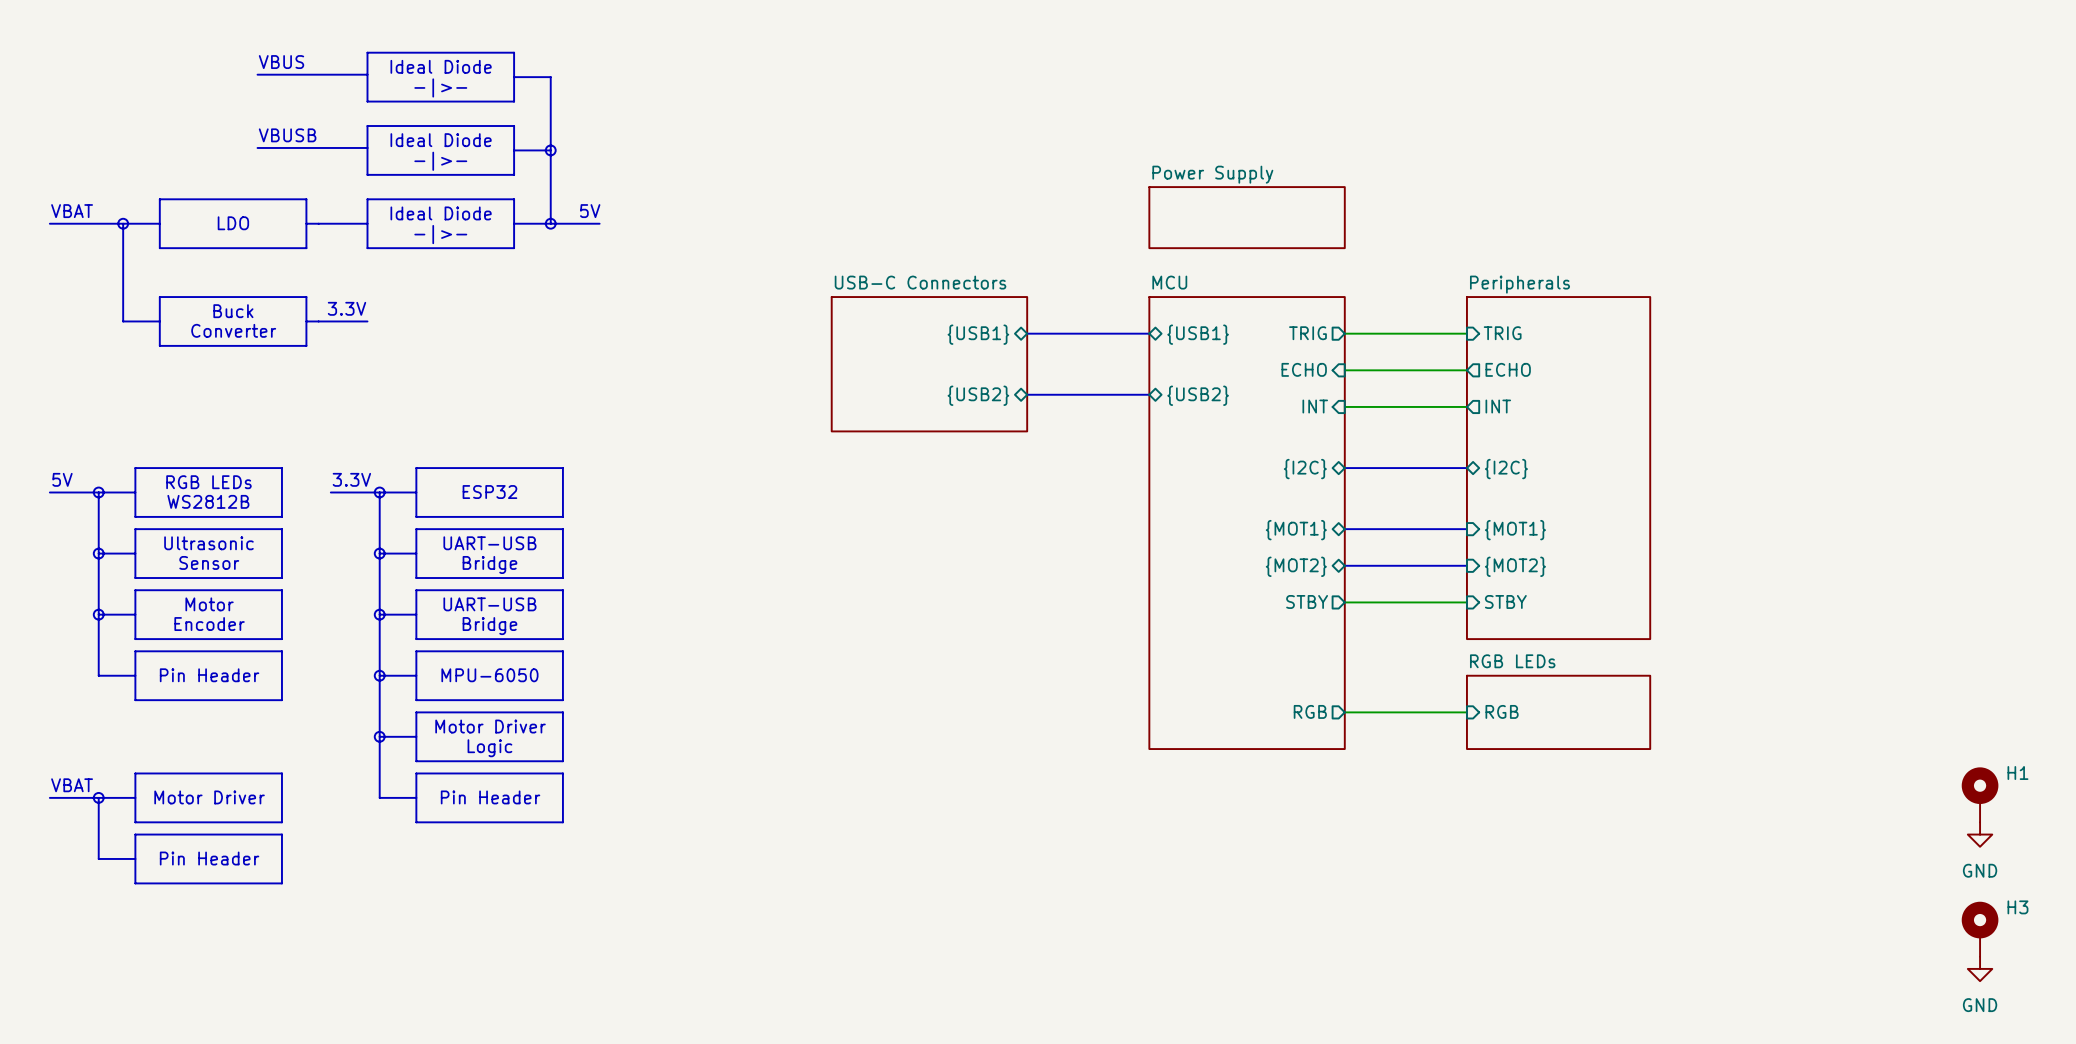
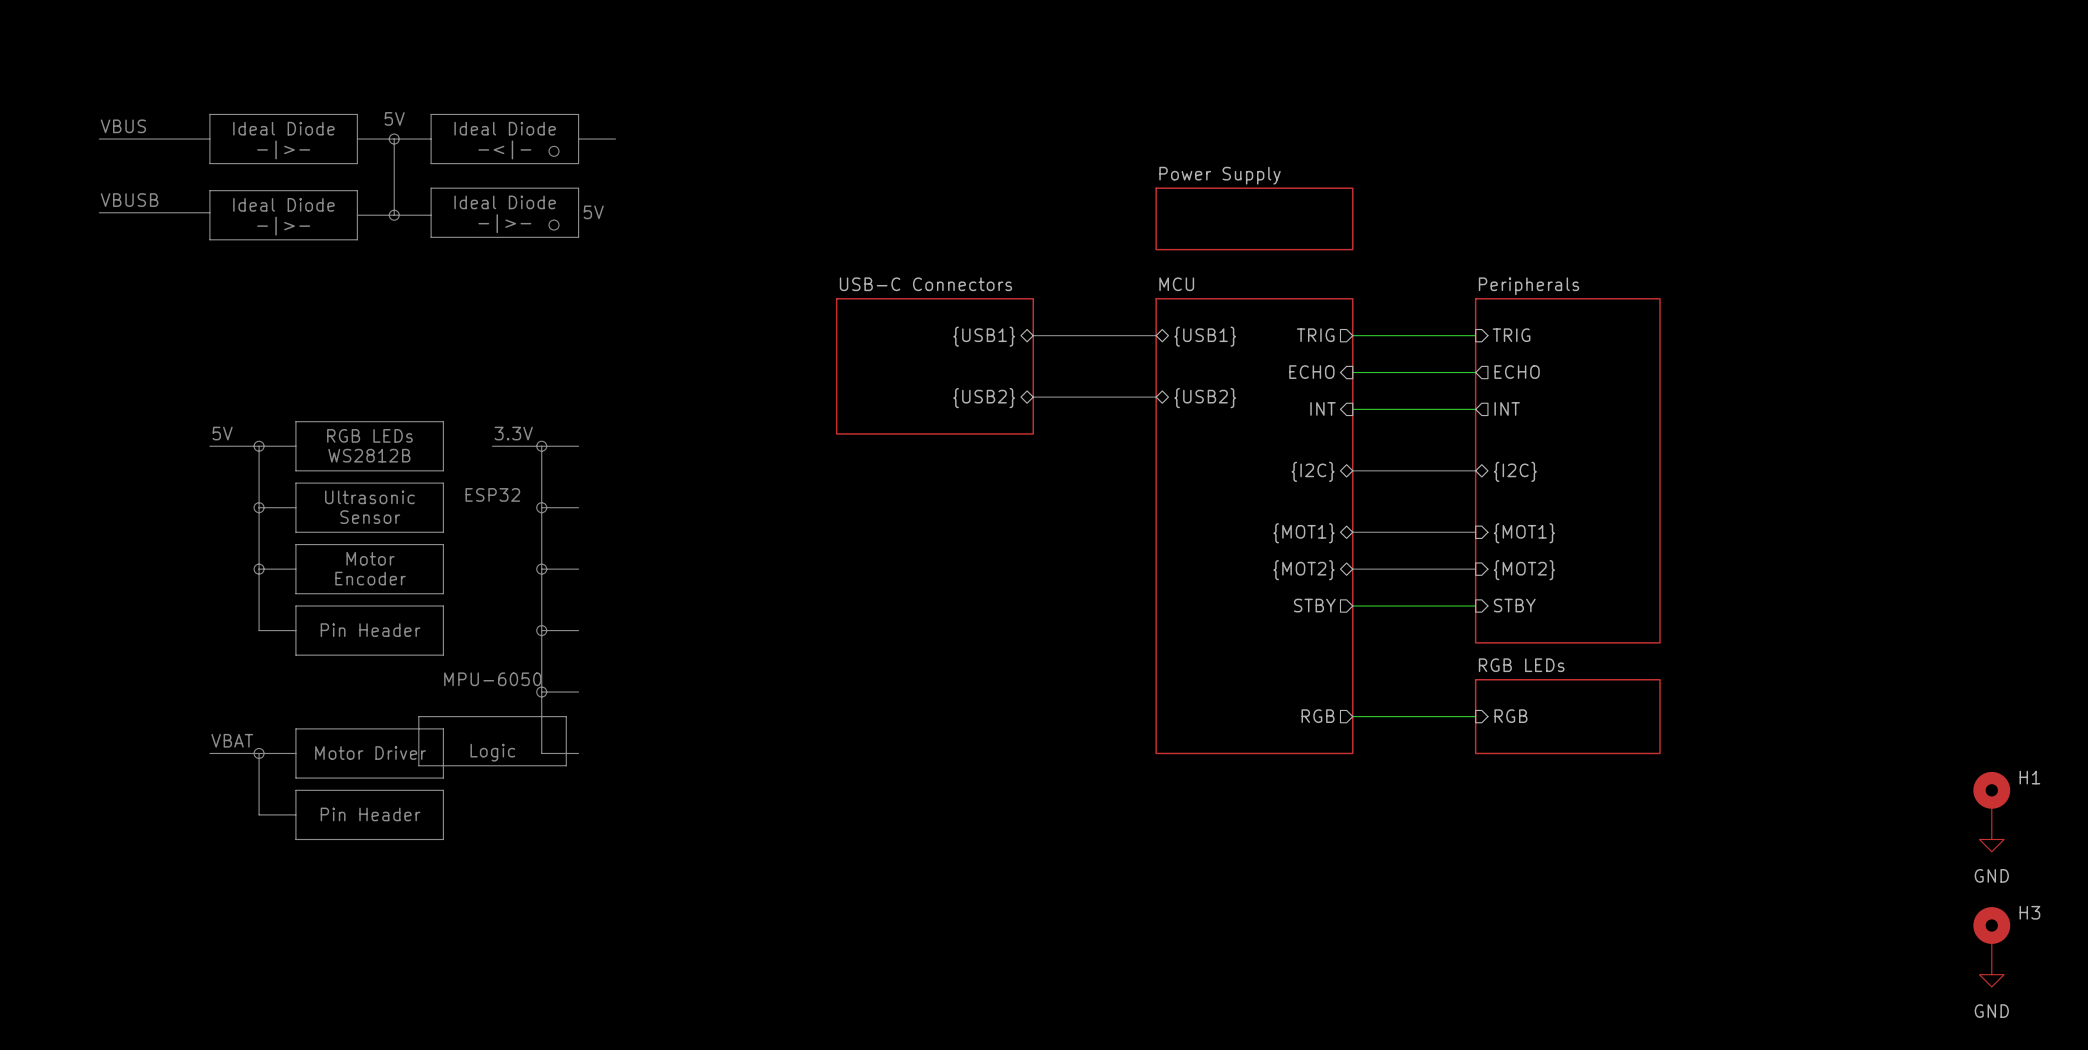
line: (367, 52) (367, 101) (514, 101) (514, 52) (367, 52) -> (209, 190) (209, 239) (357, 239) (357, 190) (209, 190)
text position: VBUS (281, 62) -> VBUS (123, 126)
text: Ideal Diode (441, 66) -> none
line: (257, 74) (367, 74) -> (99, 139) (209, 139)
line: (514, 77) (550, 77) (550, 223) -> none
text: -|>- (440, 87) -> none
text: none -> 5V (394, 118)
line: (367, 126) (514, 126) (514, 174) (367, 174) (367, 126) -> (431, 114) (578, 114) (578, 163) (431, 163) (431, 114)
text: none -> Ideal Diode (283, 128)
drawing: none -> [389, 134, 400, 145]
text position: VBUSB (287, 135) -> VBUSB (129, 200)
line: none -> (357, 139) (431, 139)
line: none -> (394, 139) (394, 215)
text position: Ideal Diode (441, 140) -> Ideal Diode (505, 128)
line: (257, 147) (367, 147) -> (99, 212) (209, 212)
text: none -> -|>- (283, 149)
line: (514, 150) (550, 150) -> (578, 139) (615, 139)
text: -|>- (440, 161) -> -<|- (504, 149)
line: (159, 199) (159, 248) (306, 248) (306, 199) (159, 199) -> (209, 114) (209, 163) (357, 163) (357, 114) (209, 114)
line: (367, 199) (367, 248) (514, 248) (514, 199) (367, 199) -> (431, 188) (431, 237) (578, 237) (578, 188) (431, 188)
text: none -> Ideal Diode (283, 204)
drawing: none -> [389, 210, 400, 221]
text: VBAT (72, 211) -> none
line: none -> (357, 215) (431, 215)
text position: Ideal Diode (441, 213) -> Ideal Diode (505, 202)
drawing: [118, 218, 129, 229] -> none
line: (49, 223) (159, 223) -> none
line: (123, 223) (123, 321) (159, 321) -> none
text: LDO (233, 223) -> none
line: (306, 223) (367, 223) -> none
line: (514, 223) (599, 223) -> none
text: none -> -|>- (283, 226)
text position: -|>- (440, 234) -> -|>- (504, 223)
line: (159, 297) (306, 297) (306, 345) (159, 345) (159, 297) -> none
text: 3.3V (346, 308) -> none
text: Buck (233, 311) -> none
line: (306, 321) (367, 321) -> none
text: Converter (233, 330) -> none
text: none -> 3.3V (513, 433)
drawing: none -> [254, 441, 265, 452]
drawing: none -> [536, 441, 547, 452]
line: (135, 468) (135, 516) (281, 516) (281, 468) (135, 468) -> none
line: (416, 468) (416, 516) (562, 516) (562, 468) (440, 468) -> (418, 470) (295, 470) (295, 421) (443, 421) (443, 470)
text position: 5V (62, 479) -> 5V (222, 433)
text: 3.3V (351, 479) -> none
text position: RGB LEDs (208, 482) -> RGB LEDs (369, 435)
drawing: [93, 487, 104, 498] -> none
drawing: [374, 487, 385, 498] -> none
line: (49, 492) (135, 492) -> (209, 446) (295, 446)
line: (98, 492) (98, 675) (135, 675) -> (259, 446) (259, 630) (295, 630)
line: (330, 492) (416, 492) -> (492, 446) (578, 446)
line: (379, 492) (379, 797) (416, 797) -> (541, 446) (541, 753) (578, 753)
drawing: none -> [254, 502, 265, 513]
drawing: none -> [536, 502, 547, 513]
text position: WS2812B (208, 501) -> WS2812B (369, 455)
line: (135, 529) (135, 578) (281, 578) (281, 529) (135, 529) -> none
line: (416, 529) (416, 578) (562, 578) (562, 529) (440, 529) -> (418, 532) (295, 532) (295, 483) (443, 483) (443, 532)
text position: Ultrasonic (208, 543) -> Ultrasonic (369, 497)
text: UART-USB (489, 543) -> none
drawing: [93, 548, 104, 559] -> none
drawing: [374, 548, 385, 559] -> none
line: (98, 553) (135, 553) -> (259, 507) (295, 507)
line: (379, 553) (416, 553) -> (541, 507) (578, 507)
drawing: none -> [254, 564, 265, 575]
drawing: none -> [536, 564, 547, 575]
text position: Sensor (209, 562) -> Sensor (370, 517)
text: Bridge (489, 564) -> none
line: (135, 590) (281, 590) (281, 639) (135, 639) (135, 590) -> none
line: (416, 590) (416, 639) (562, 639) (562, 590) (440, 590) -> (418, 593) (295, 593) (295, 544) (443, 544) (443, 593)
text position: Motor (209, 604) -> Motor (370, 558)
text: UART-USB (489, 604) -> none
drawing: [93, 609, 104, 620] -> none
drawing: [374, 609, 385, 620] -> none
line: (98, 614) (135, 614) -> (259, 569) (295, 569)
line: (379, 614) (416, 614) -> (541, 569) (578, 569)
drawing: none -> [536, 625, 547, 636]
text position: Encoder (209, 624) -> Encoder (370, 578)
text: none -> Pin Header (370, 630)
text: Bridge (489, 626) -> none
line: (135, 651) (135, 700) (281, 700) (281, 651) (135, 651) -> none
line: (416, 651) (416, 700) (562, 700) (562, 651) (440, 651) -> (418, 655) (295, 655) (295, 606) (443, 606) (443, 655)
drawing: [374, 670, 385, 681] -> none
text: Pin Header (209, 675) -> none
line: (379, 675) (416, 675) -> (541, 630) (578, 630)
drawing: none -> [536, 687, 547, 698]
text position: Motor Driver (490, 726) -> Motor Driver (370, 753)
drawing: [374, 731, 385, 742] -> none
line: (379, 736) (416, 736) -> (541, 692) (578, 692)
drawing: none -> [254, 748, 265, 759]
line: (135, 773) (135, 822) (281, 822) (281, 773) (135, 773) -> none
line: (416, 773) (416, 822) (562, 822) (562, 773) (440, 773) -> (418, 778) (295, 778) (295, 728) (443, 728) (443, 778)
text position: VBAT (72, 785) -> VBAT (232, 740)
drawing: [93, 792, 104, 803] -> none
line: (49, 797) (135, 797) -> (209, 753) (295, 753)
line: (98, 797) (98, 858) (135, 858) -> (259, 753) (259, 814) (295, 814)
text: Motor Driver (209, 797) -> none
text: Pin Header (490, 797) -> none
text: none -> Pin Header (370, 814)
line: (135, 834) (135, 883) (281, 883) (281, 834) (135, 834) -> (295, 790) (295, 839) (443, 839) (443, 790) (295, 790)
text: Pin Header (209, 858) -> none

